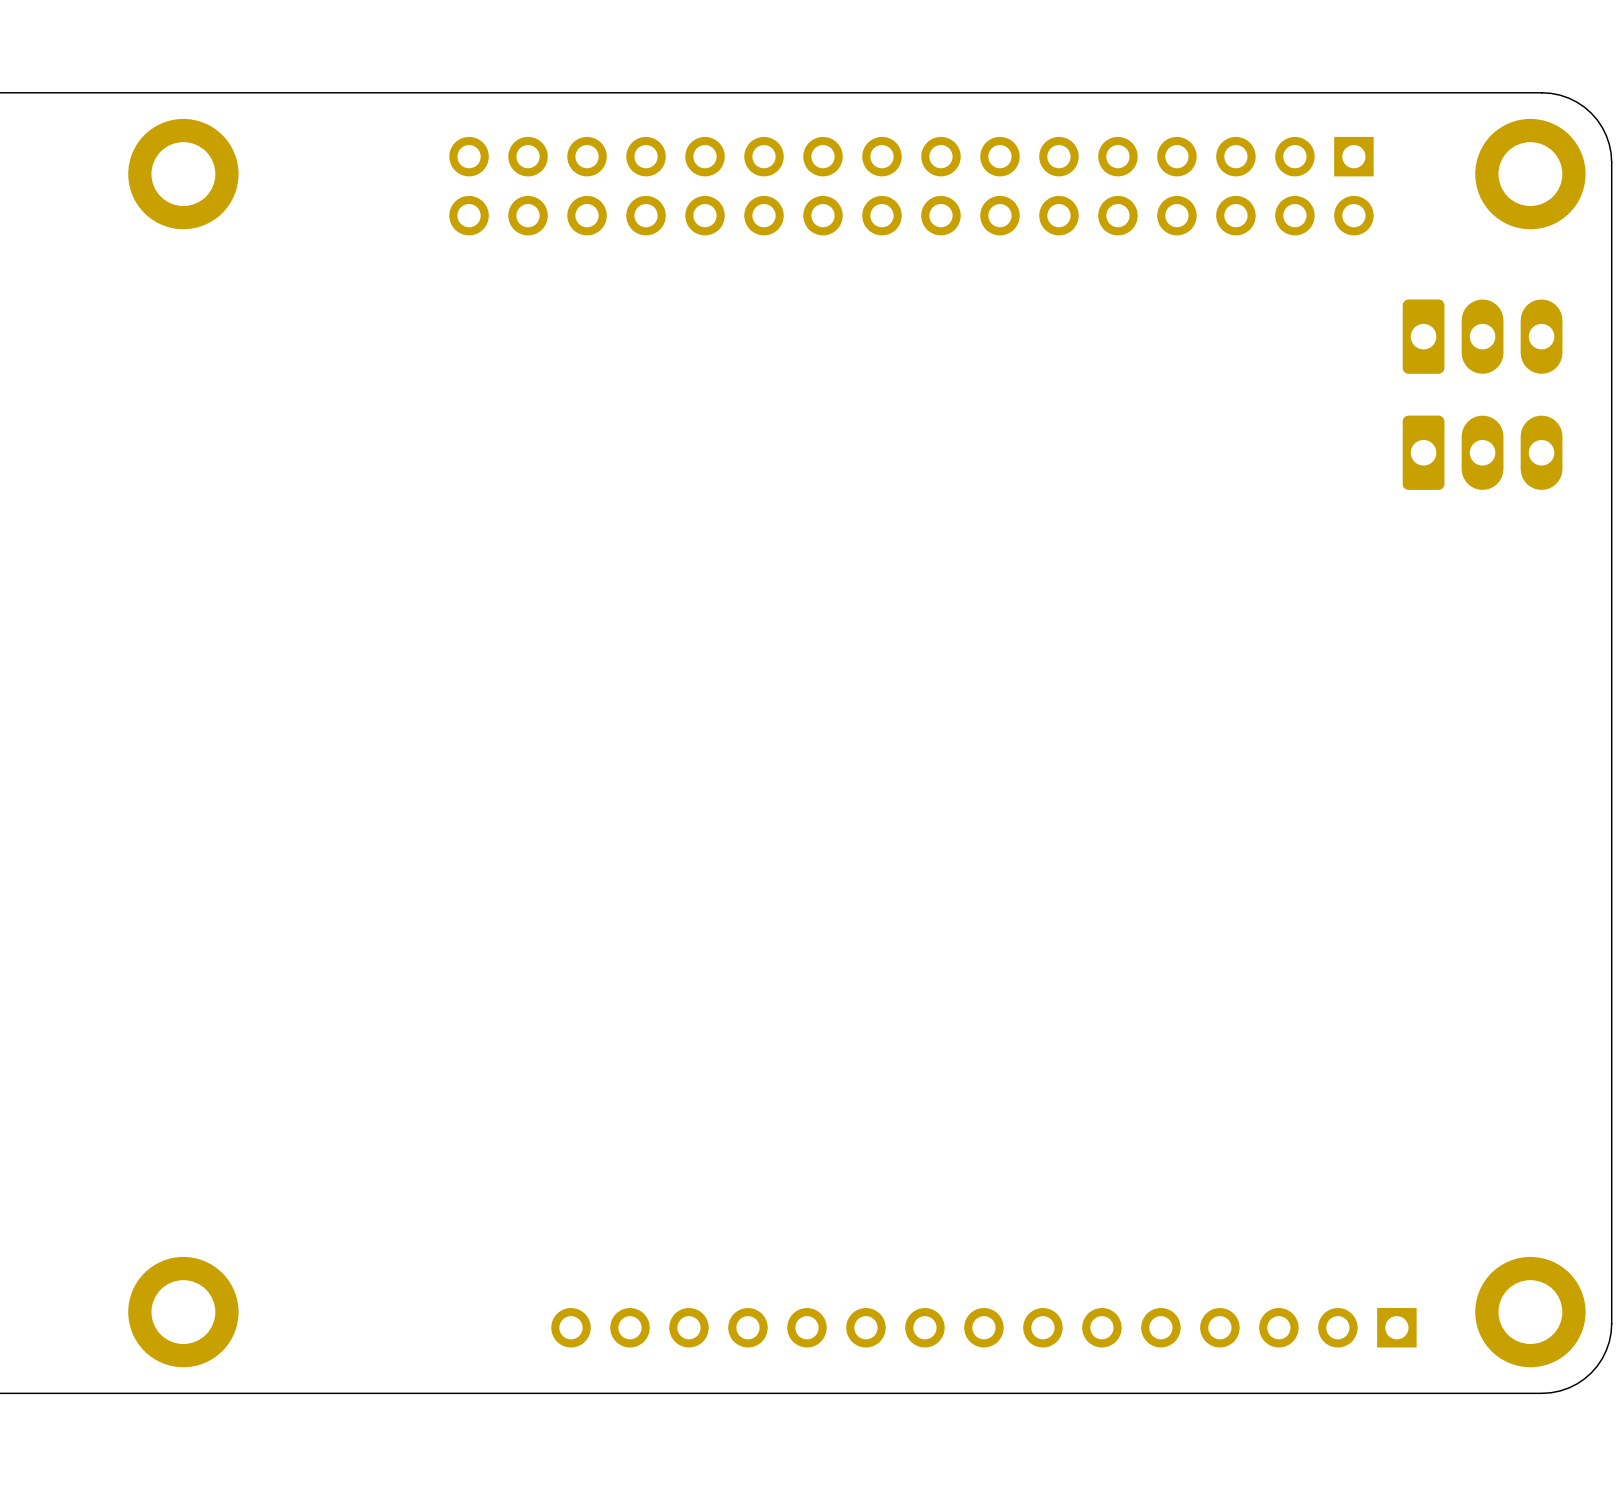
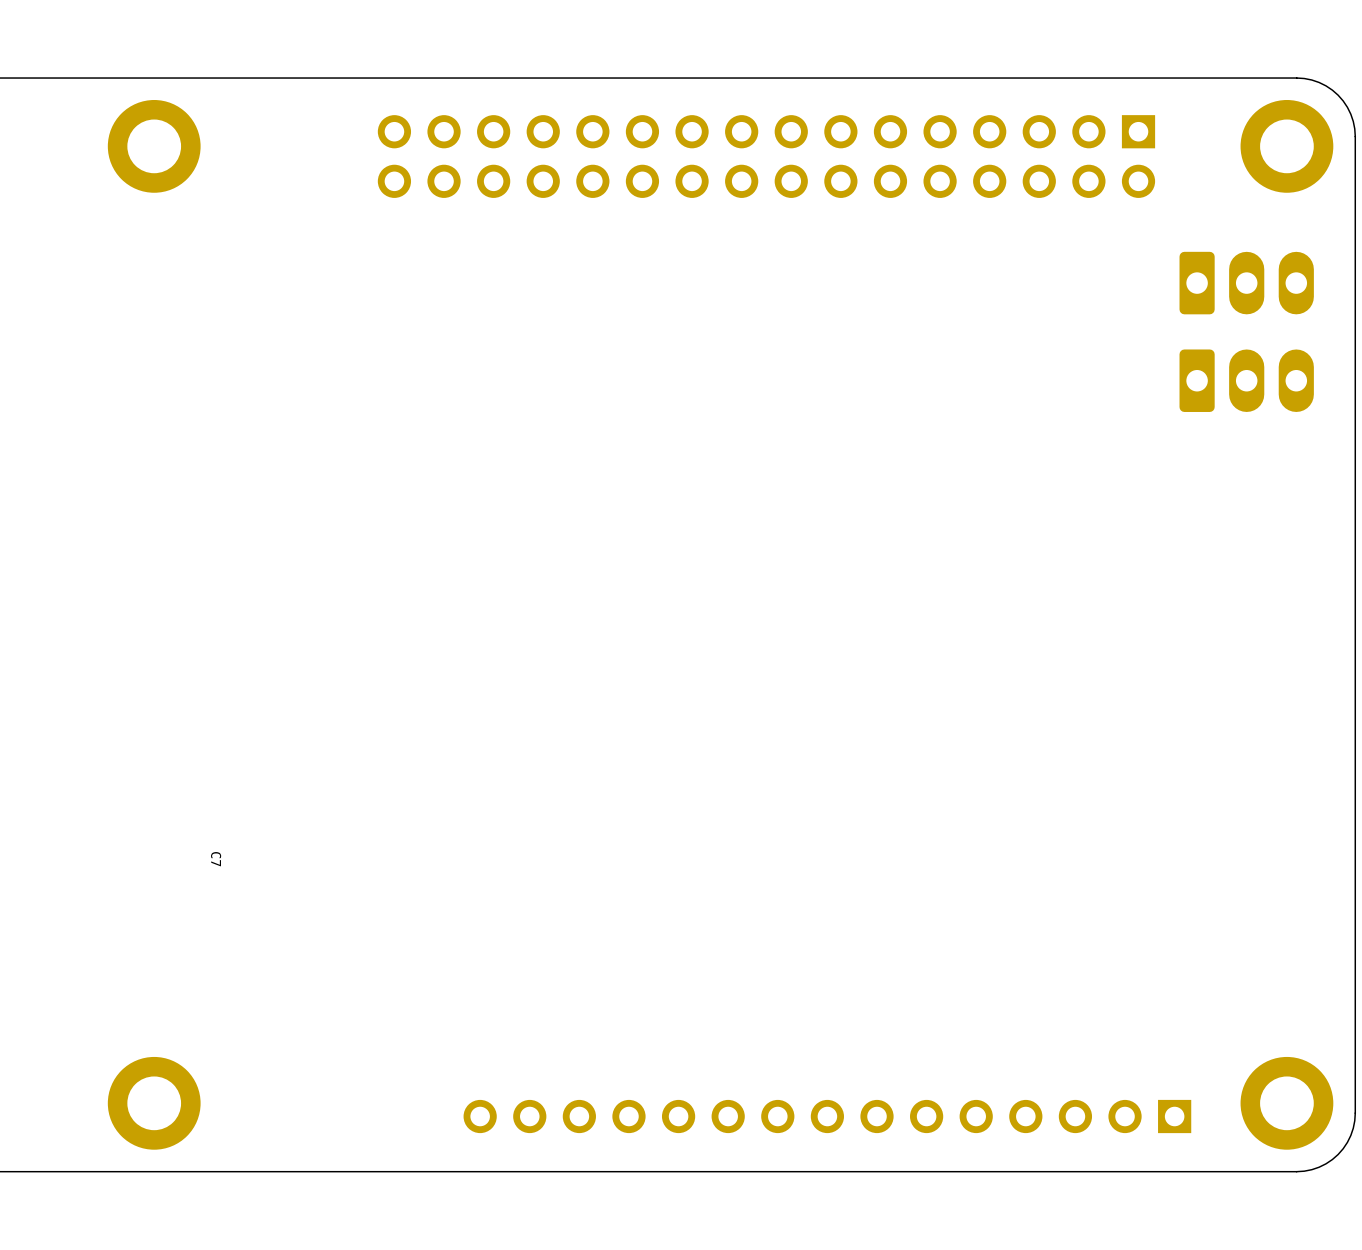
C7: none -> (216, 859)

